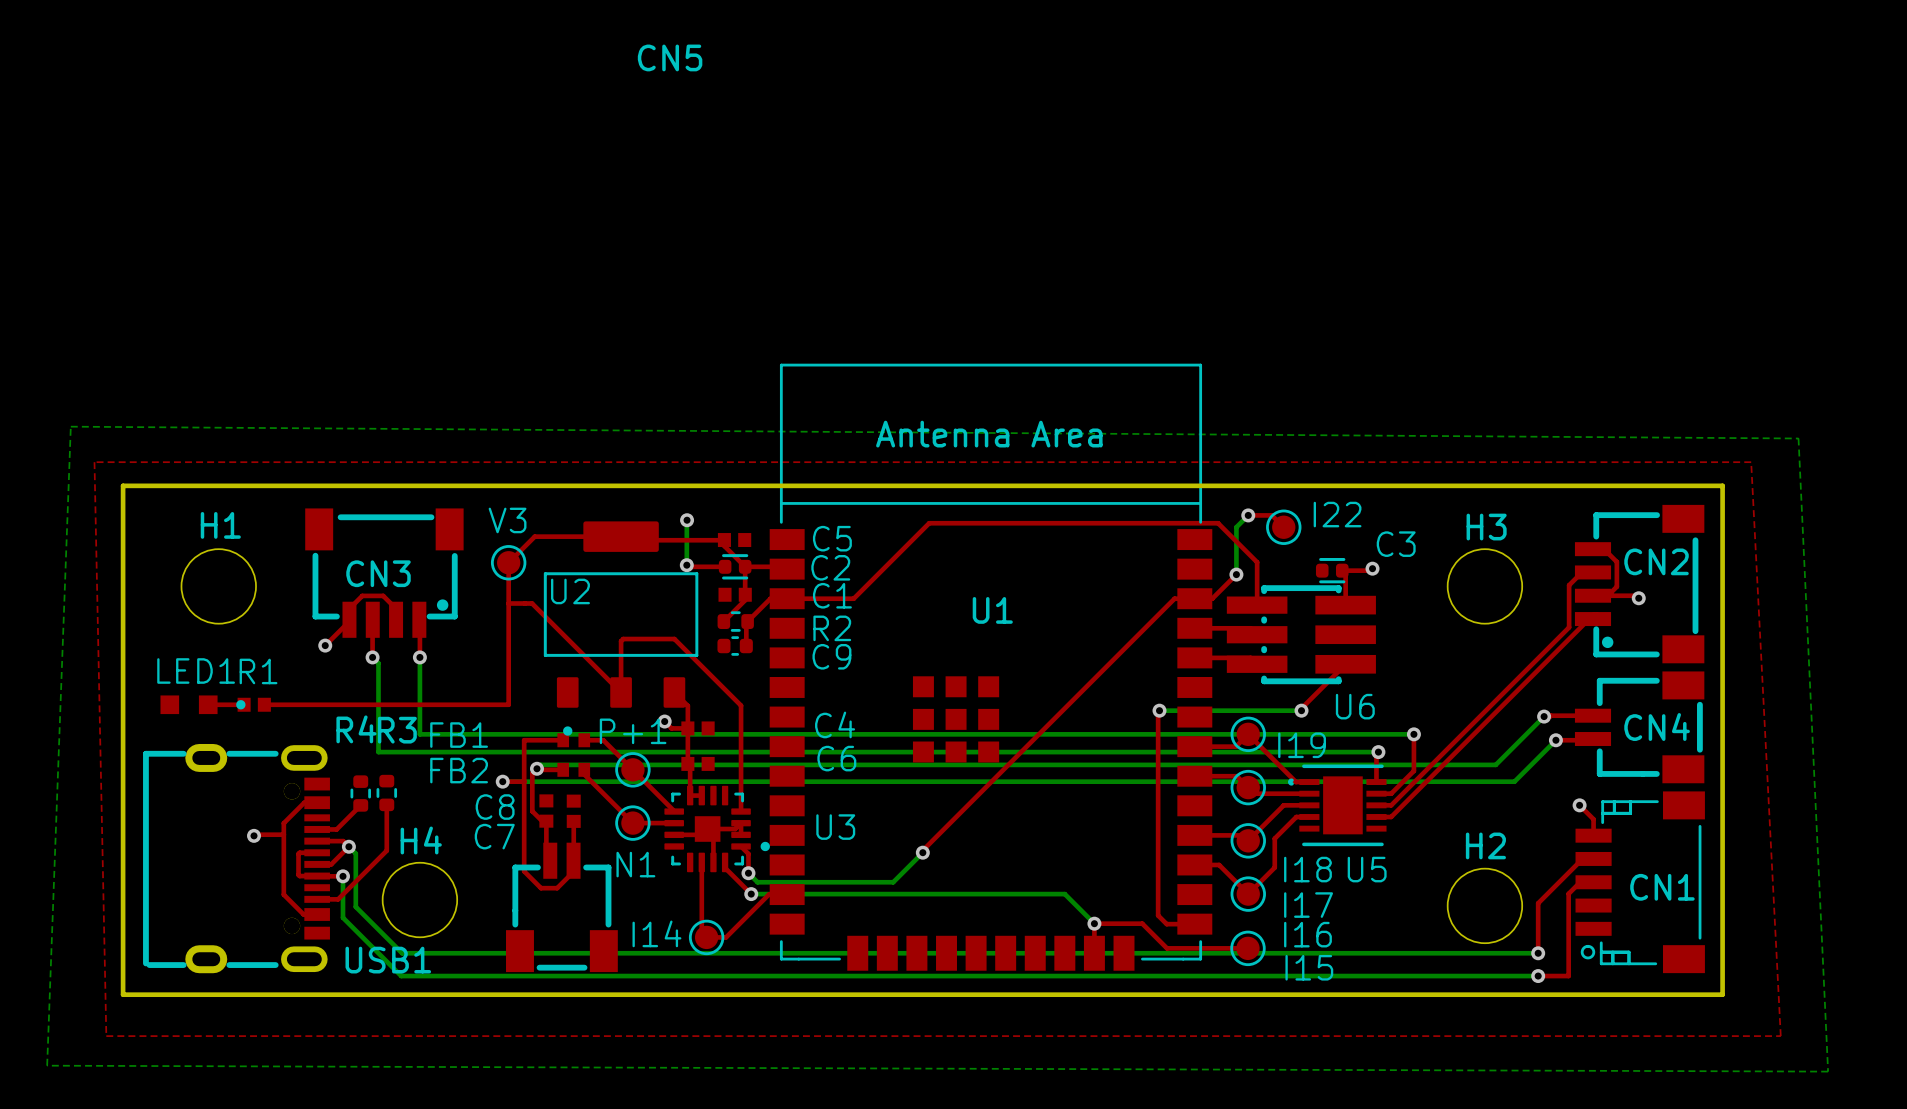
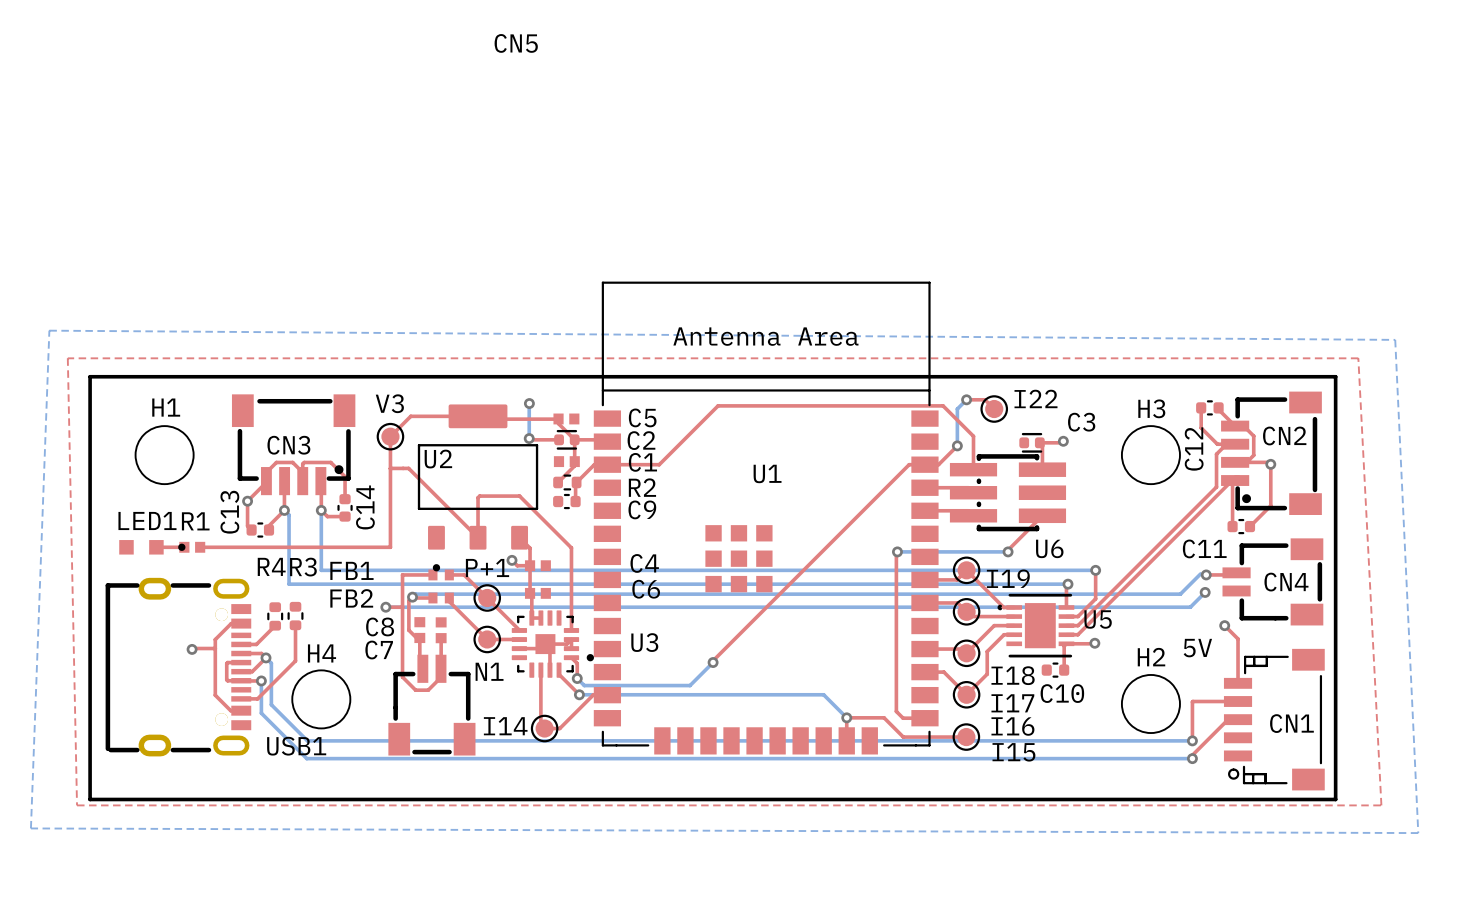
board edge: (1722, 485) (1722, 994) (123, 994) -> (1335, 376) (1335, 799) (90, 799) (90, 773)
top track: none -> (1201, 407) (1201, 427) (1217, 444) (1226, 444)
C12: none -> (1209, 407)
top track: none -> (1218, 407) (1235, 426)
top track: none -> (1270, 464) (1270, 505) (1249, 526)
top track: none -> (302, 472) (304, 462) (330, 462) (345, 476) (345, 499)
top track: none -> (1235, 480) (1232, 483) (1232, 526)
top track: none -> (247, 501) (247, 525) (251, 530)
C14: none -> (345, 507)
top track: none -> (284, 510) (269, 525) (269, 530)
top track: none -> (321, 510) (327, 516) (345, 516)
C11: none -> (1241, 526)
C13: none -> (260, 530)
top track: (1592, 715) (1544, 716) -> none
bottom track: (1544, 716) (1495, 764) -> (1200, 573) (1180, 594) (1159, 594)
via position: (1544, 716) -> (1205, 592)
CN4 position: (1639, 727) -> (1272, 581)
bottom track: (1555, 740) (1514, 781) -> (1205, 592) (1190, 607) (1174, 607)
top track: (1593, 819) (1593, 835) -> (1235, 636) (1238, 638) (1238, 683)
top track: none -> (1094, 643) (1066, 643) (1064, 646) (1064, 670)
via: none -> (1094, 643)
text: none -> 5V (1197, 648)
top track: (1593, 858) (1582, 858) (1538, 902) -> (1238, 701) (1192, 701)
C10: none -> (1055, 670)
U5 name position: U5 (1367, 869) -> U5 (1098, 619)
top track: (1593, 882) (1580, 882) (1568, 893) (1568, 976) (1538, 976) -> (1238, 719) (1228, 719) (1192, 755) (1192, 758)
CN1 position: (1640, 882) -> (1274, 719)

